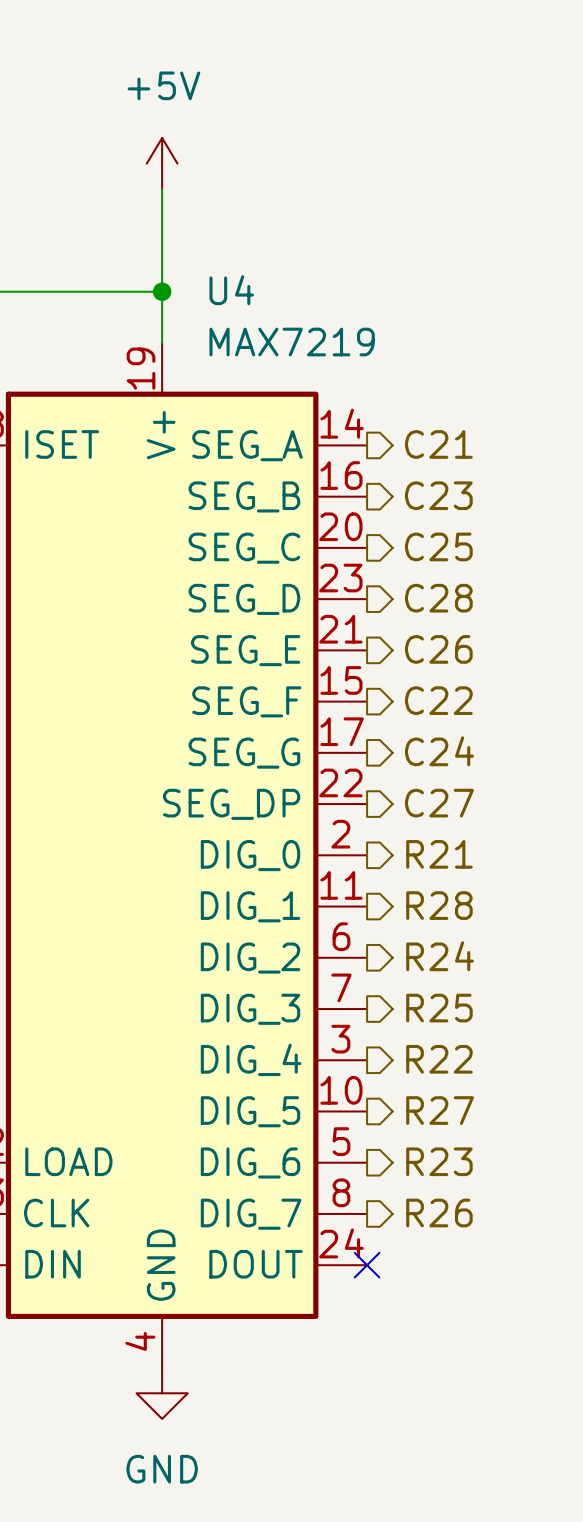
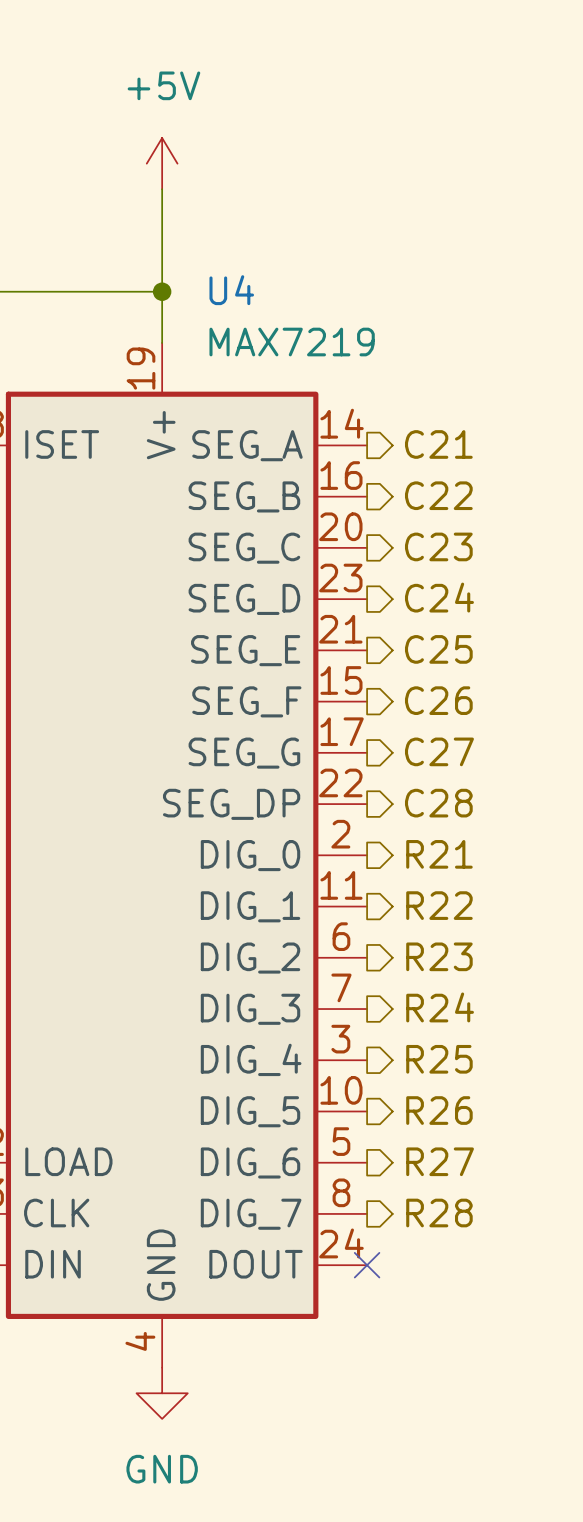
hierarchical label: C23 (438, 495) -> C22 (438, 495)
hierarchical label: C25 (438, 546) -> C23 (438, 546)
hierarchical label: C28 (438, 598) -> C24 (439, 597)
hierarchical label: C26 (438, 649) -> C25 (438, 649)
hierarchical label: C22 (438, 700) -> C26 (438, 700)
hierarchical label: C24 (439, 751) -> C27 (439, 751)
hierarchical label: C27 (439, 803) -> C28 (438, 803)
hierarchical label: R28 (439, 905) -> R22 (439, 905)
hierarchical label: R24 (440, 956) -> R23 (439, 956)
hierarchical label: R25 (439, 1008) -> R24 (440, 1007)
hierarchical label: R22 (439, 1059) -> R25 (439, 1059)
hierarchical label: R27 (440, 1110) -> R26 (439, 1110)
hierarchical label: R23 (439, 1161) -> R27 (440, 1161)
hierarchical label: R26 (439, 1213) -> R28 (439, 1213)

